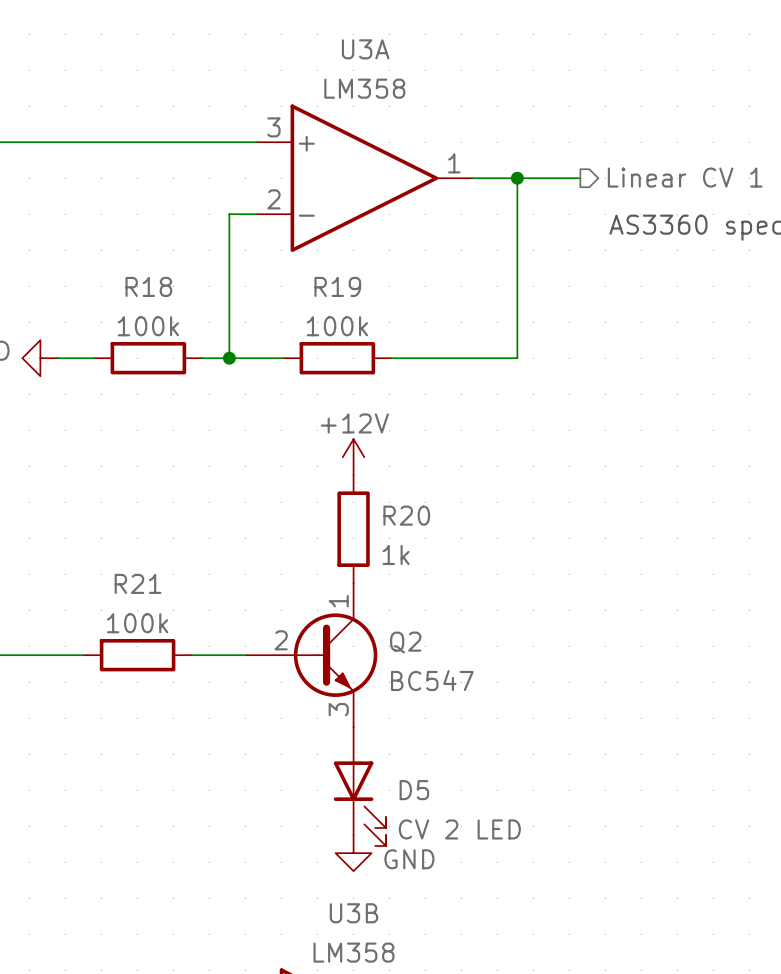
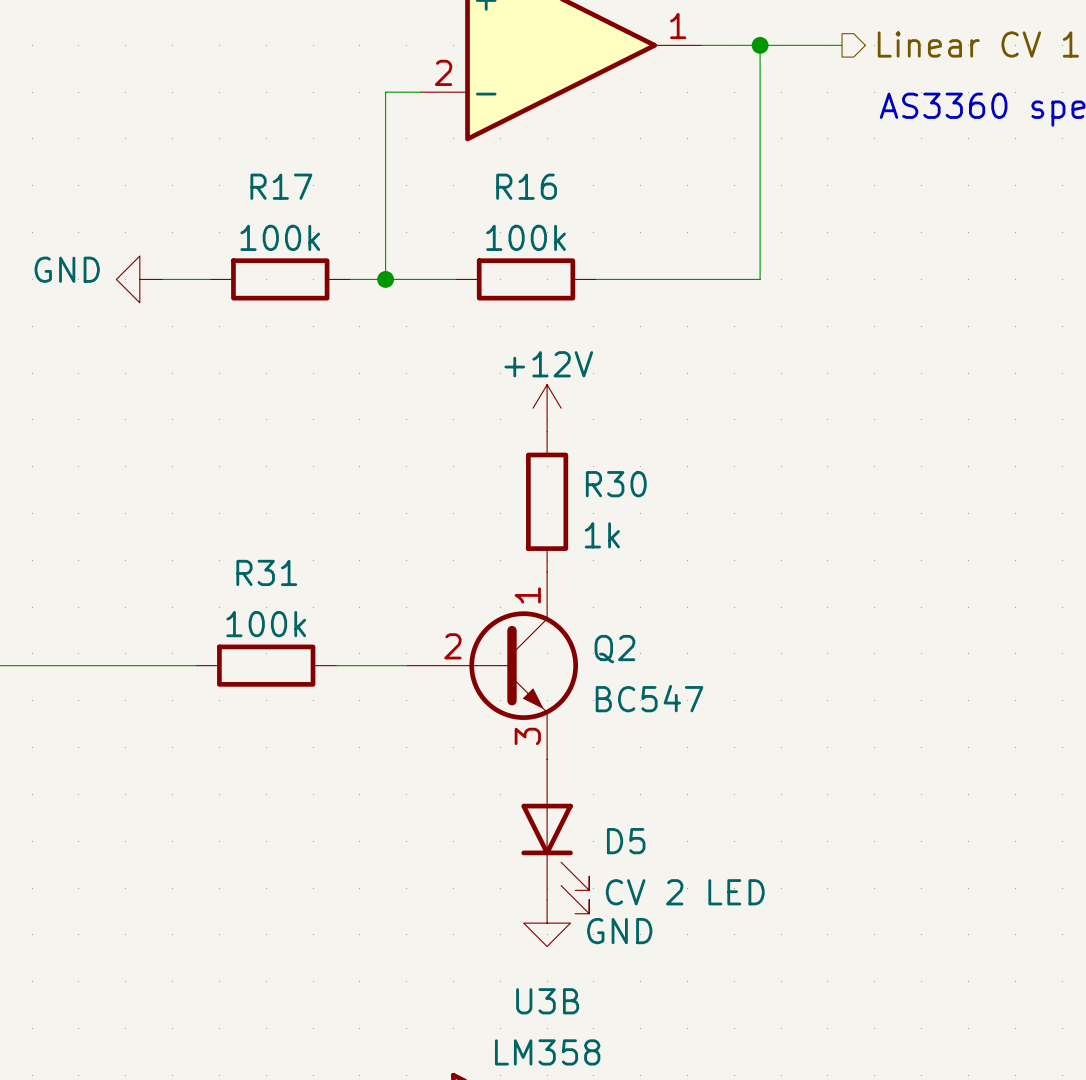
R18 name: R18 (148, 286) -> R17 (281, 186)
R19 name: R19 (337, 286) -> R16 (526, 186)
R20 name: R20 (406, 515) -> R30 (616, 484)
R21 name: R21 (138, 583) -> R31 (266, 572)

